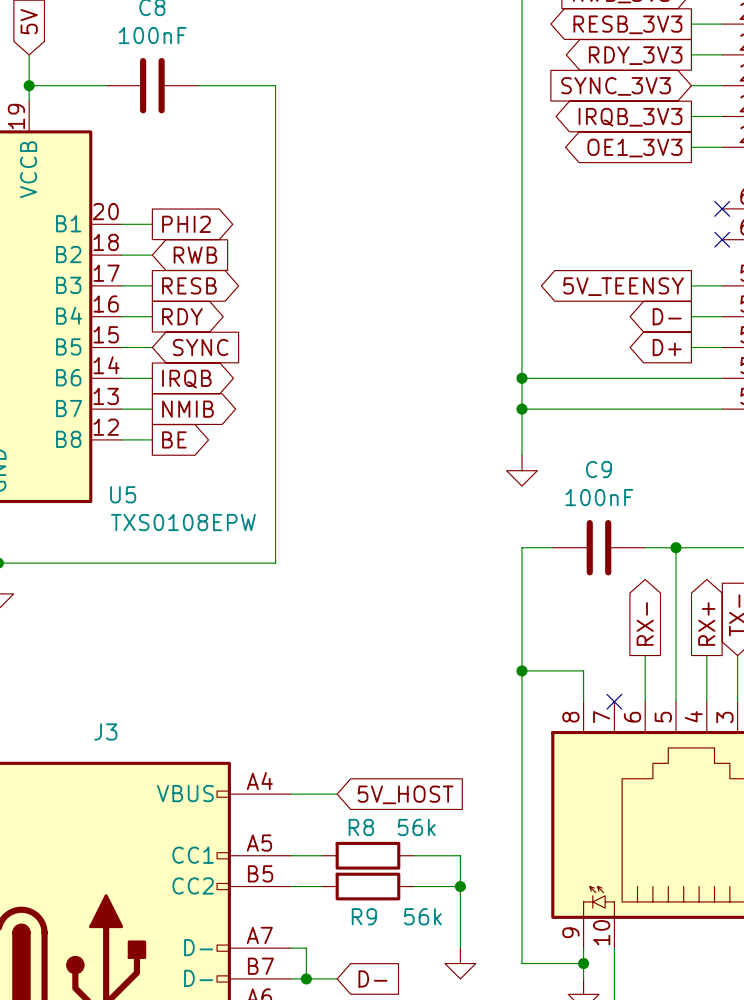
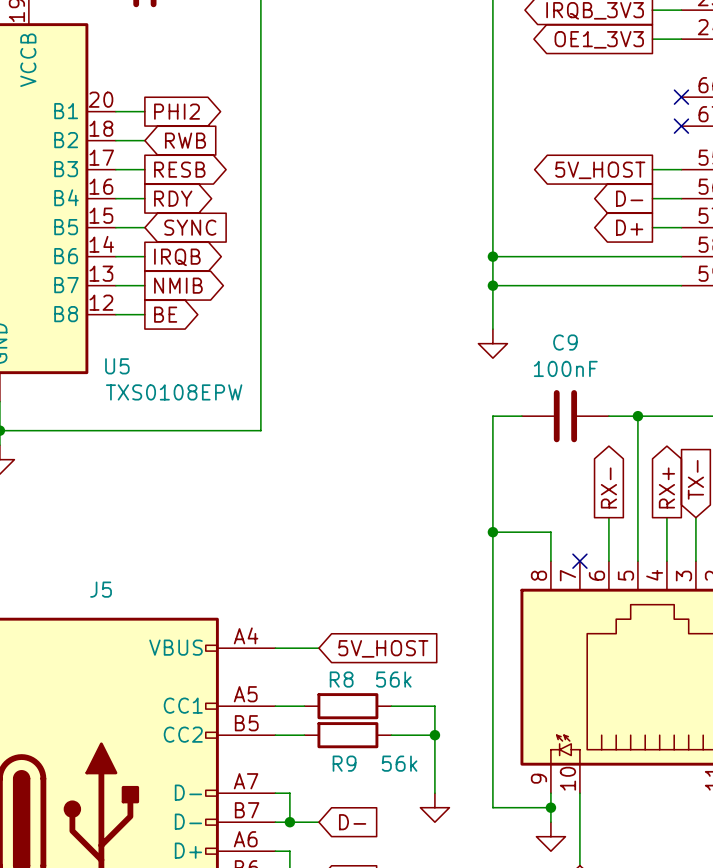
global label: 5V_TEENSY (623, 286) -> 5V_HOST (600, 170)
J3 name: J3 (105, 731) -> J5 (101, 589)

